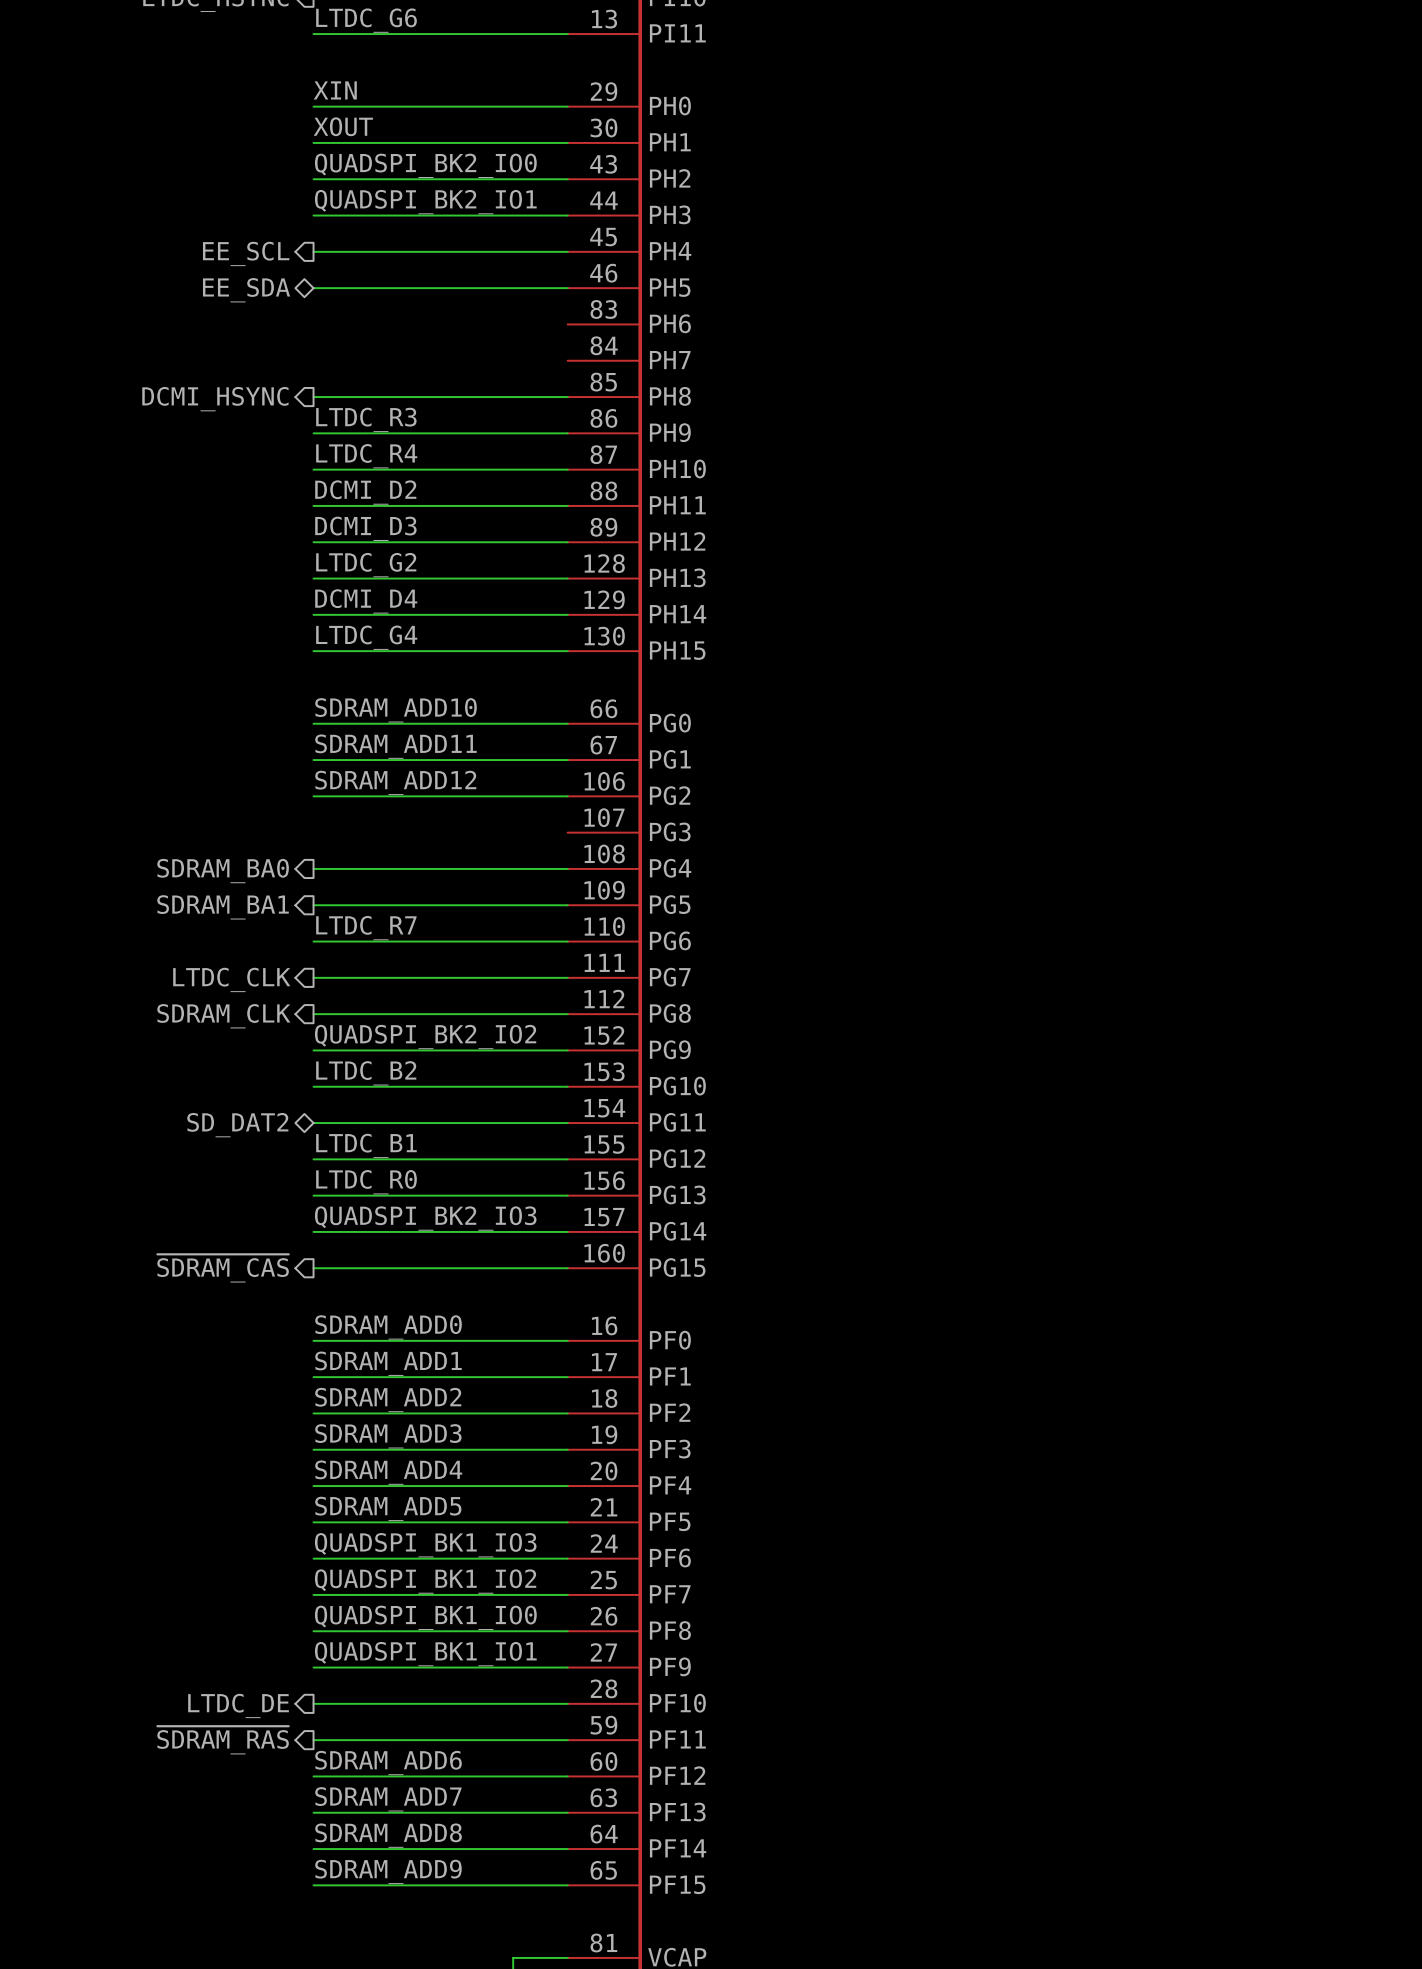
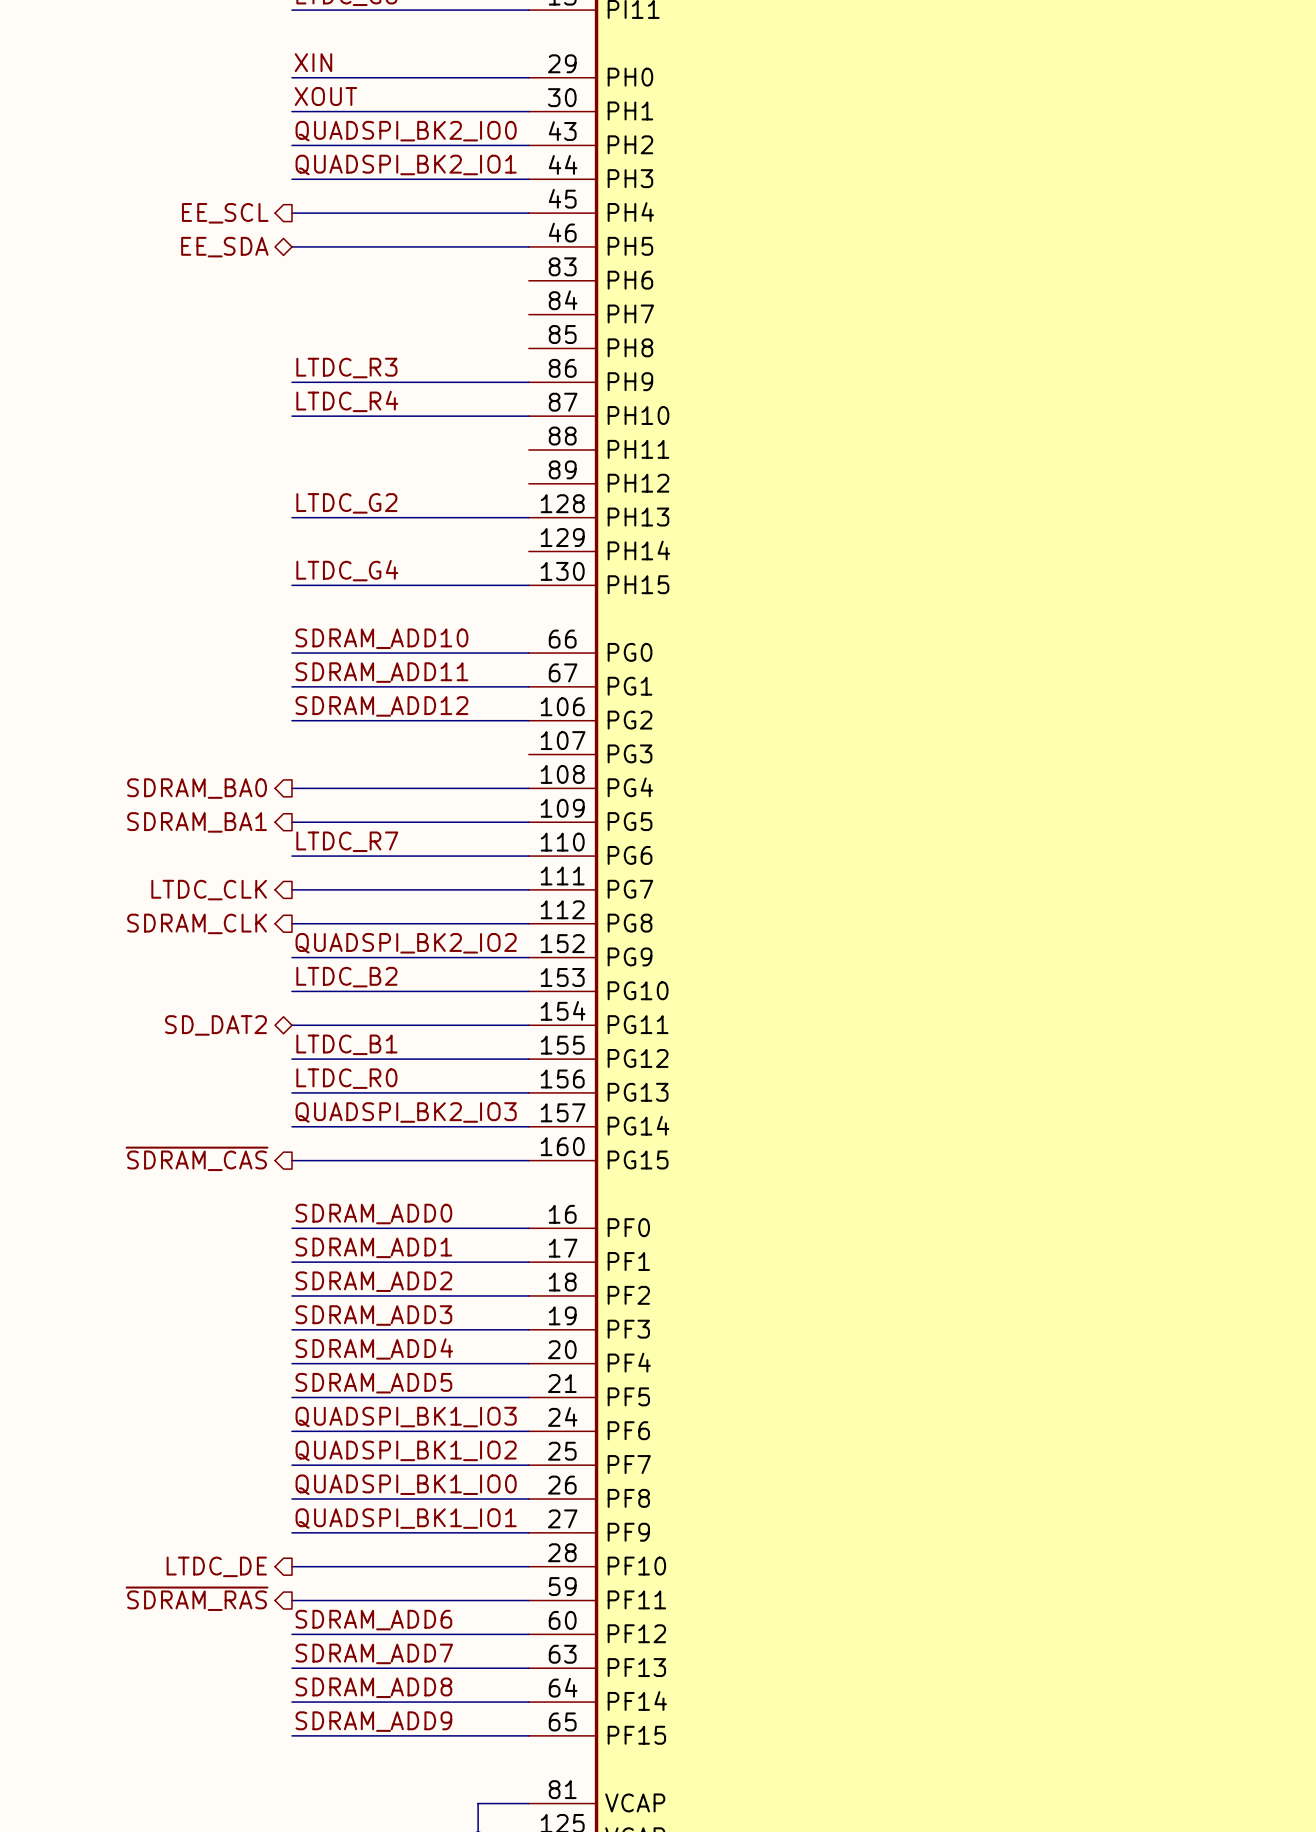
wire: (313, 397) (567, 397) -> none
hierarchical label: DCMI_HSYNC (215, 399) -> none
label: DCMI_D2 (365, 492) -> none
wire: (313, 505) (567, 505) -> none
label: DCMI_D3 (365, 528) -> none
wire: (313, 542) (567, 542) -> none
label: DCMI_D4 (366, 601) -> none
wire: (313, 614) (567, 614) -> none

